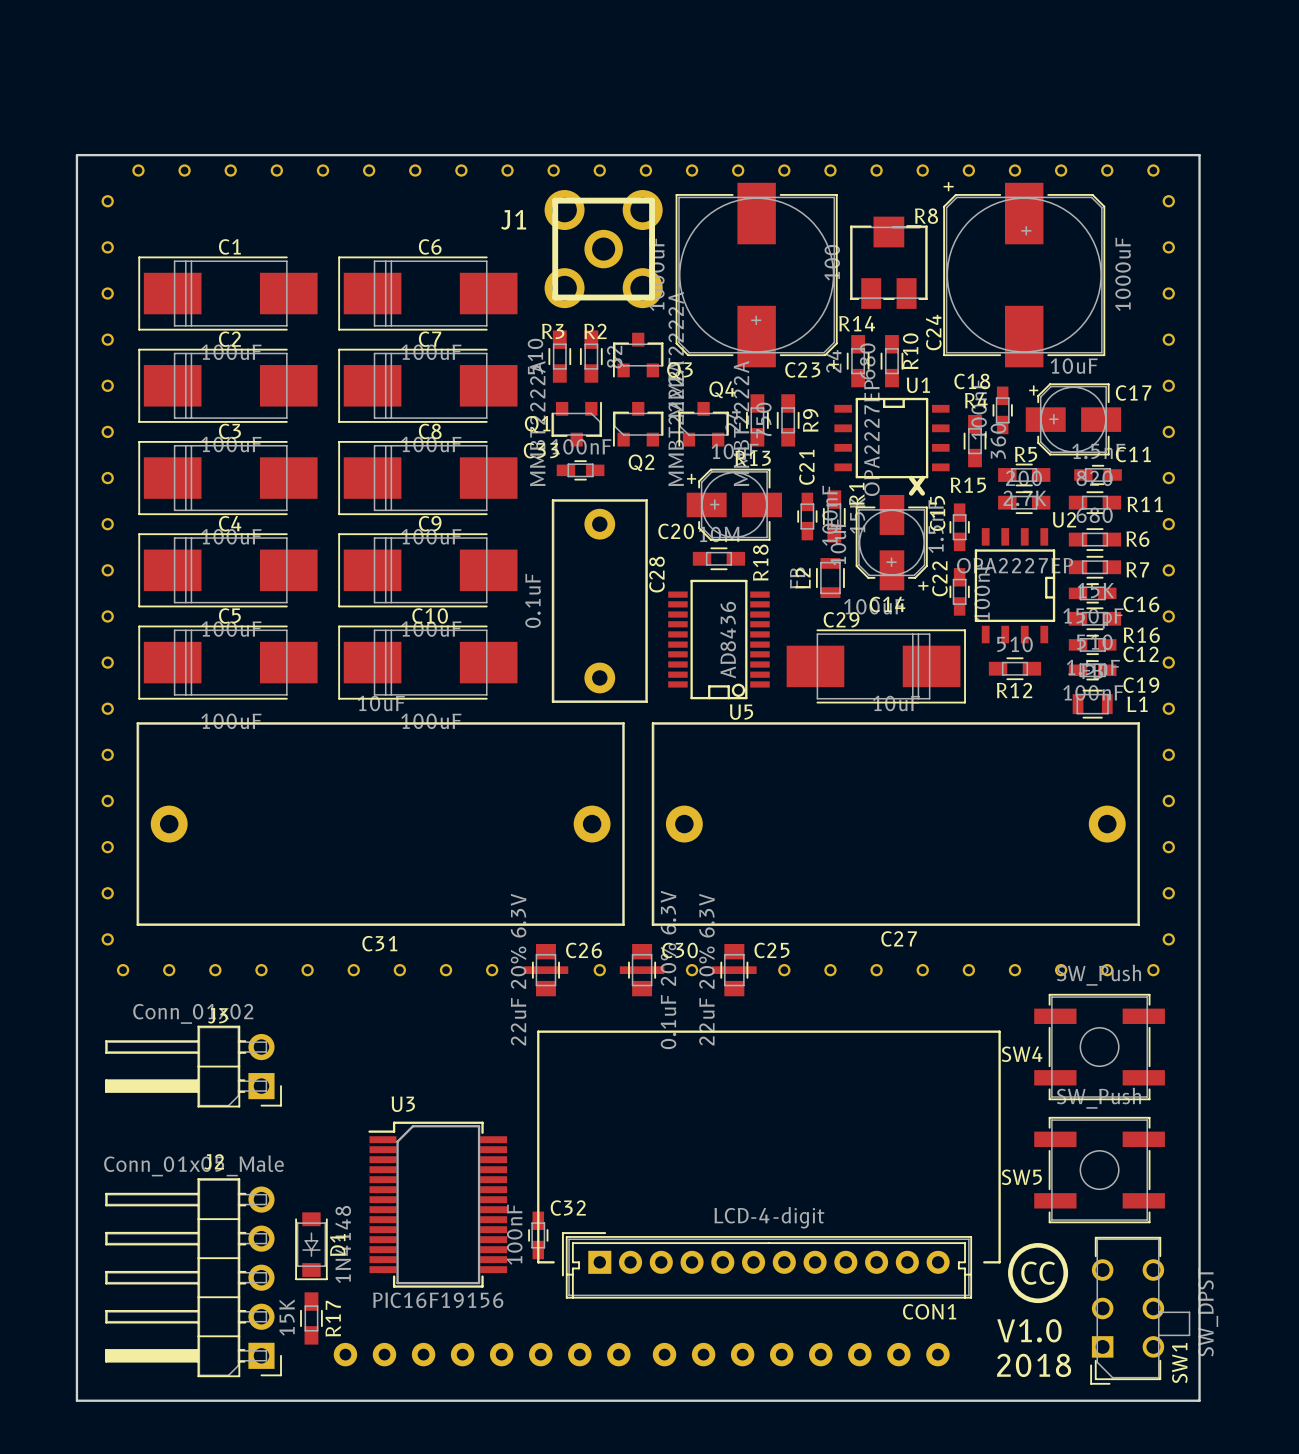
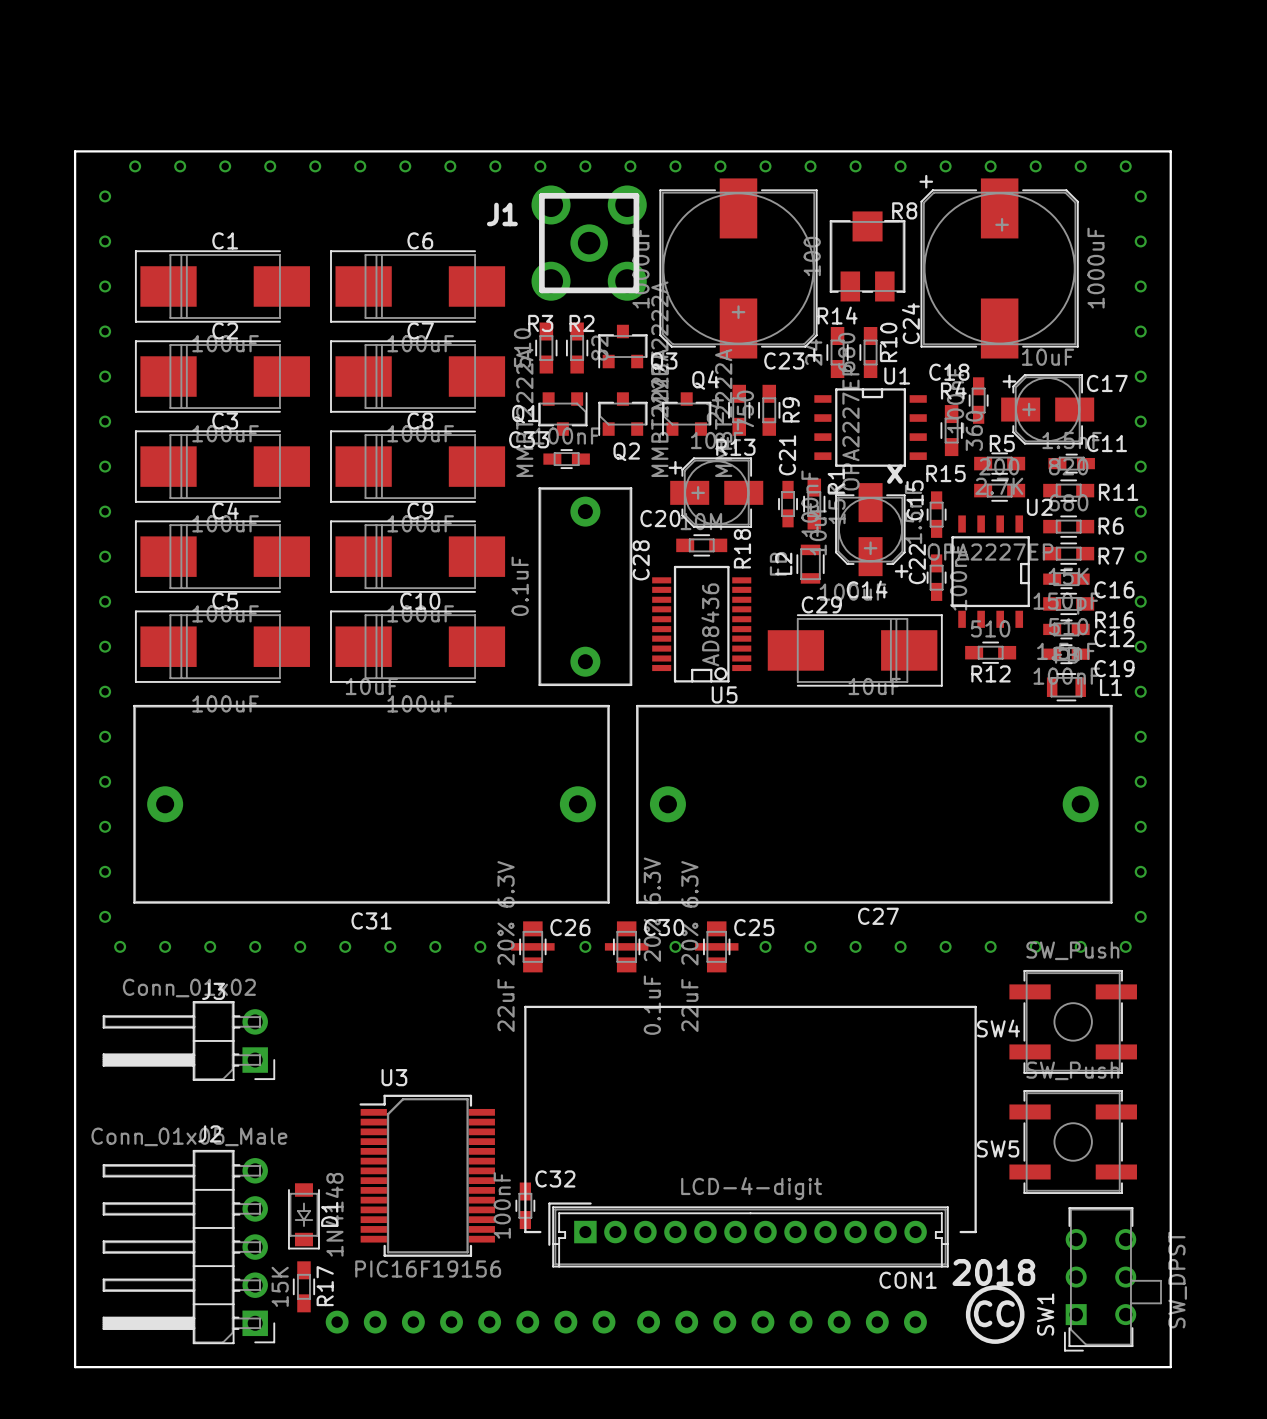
text position: CC (1038, 1273) -> CC (994, 1313)
drawing position: (1038, 1273) -> (995, 1314)
text: V1.0 (1029, 1330) -> none
SW1 name position: SW1 (1179, 1363) -> SW1 (1045, 1314)
text position: 2018 (1034, 1365) -> 2018 (993, 1272)

